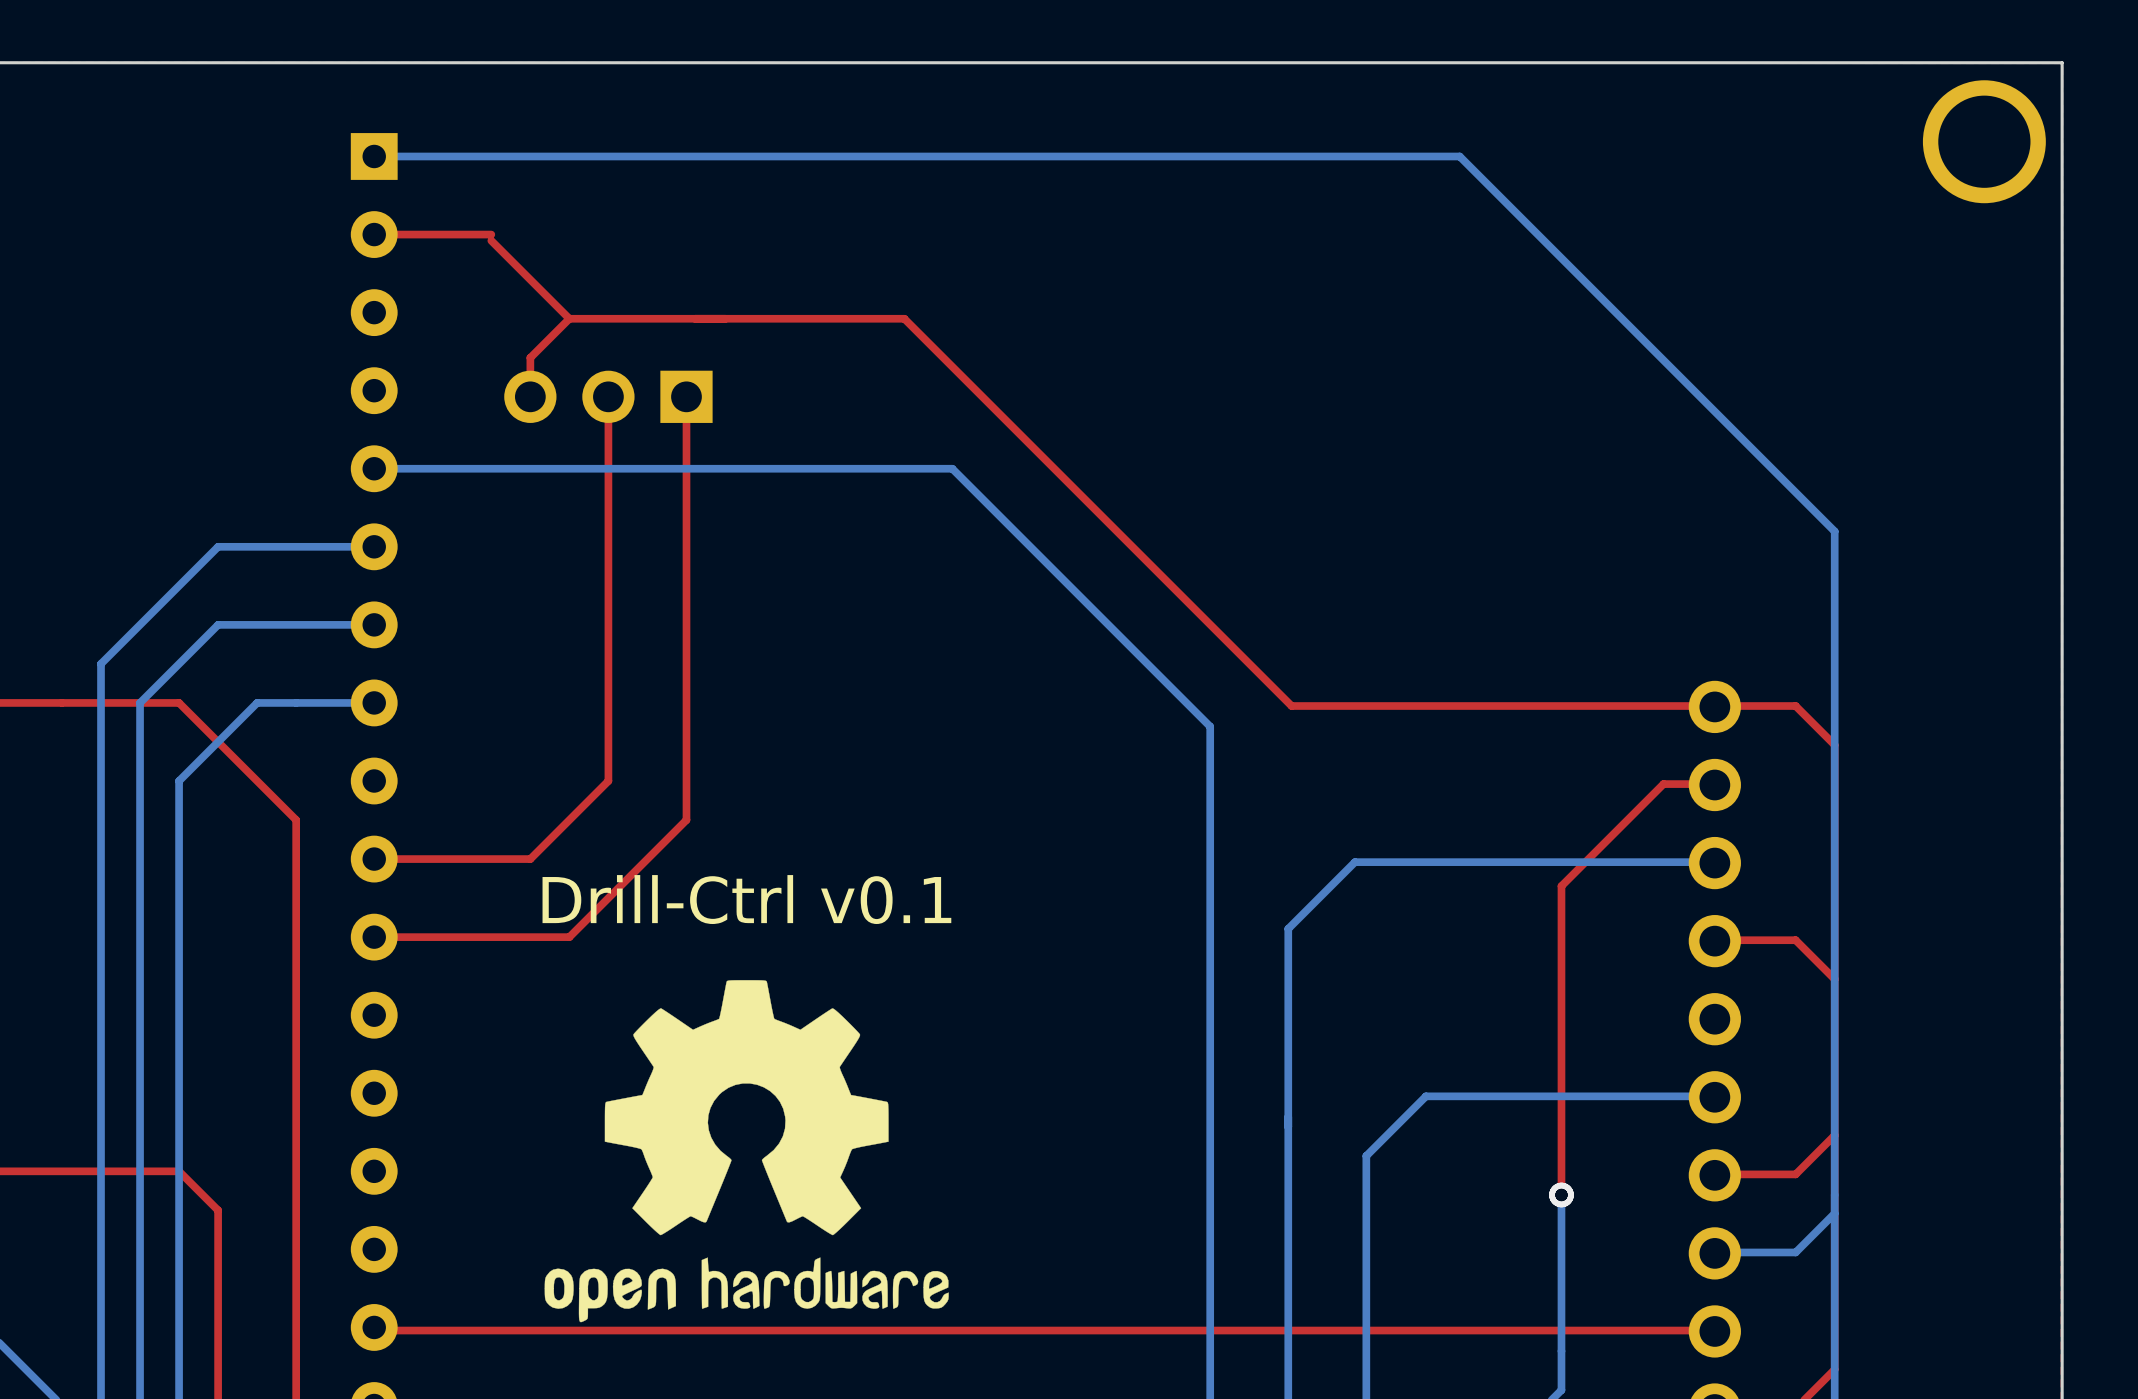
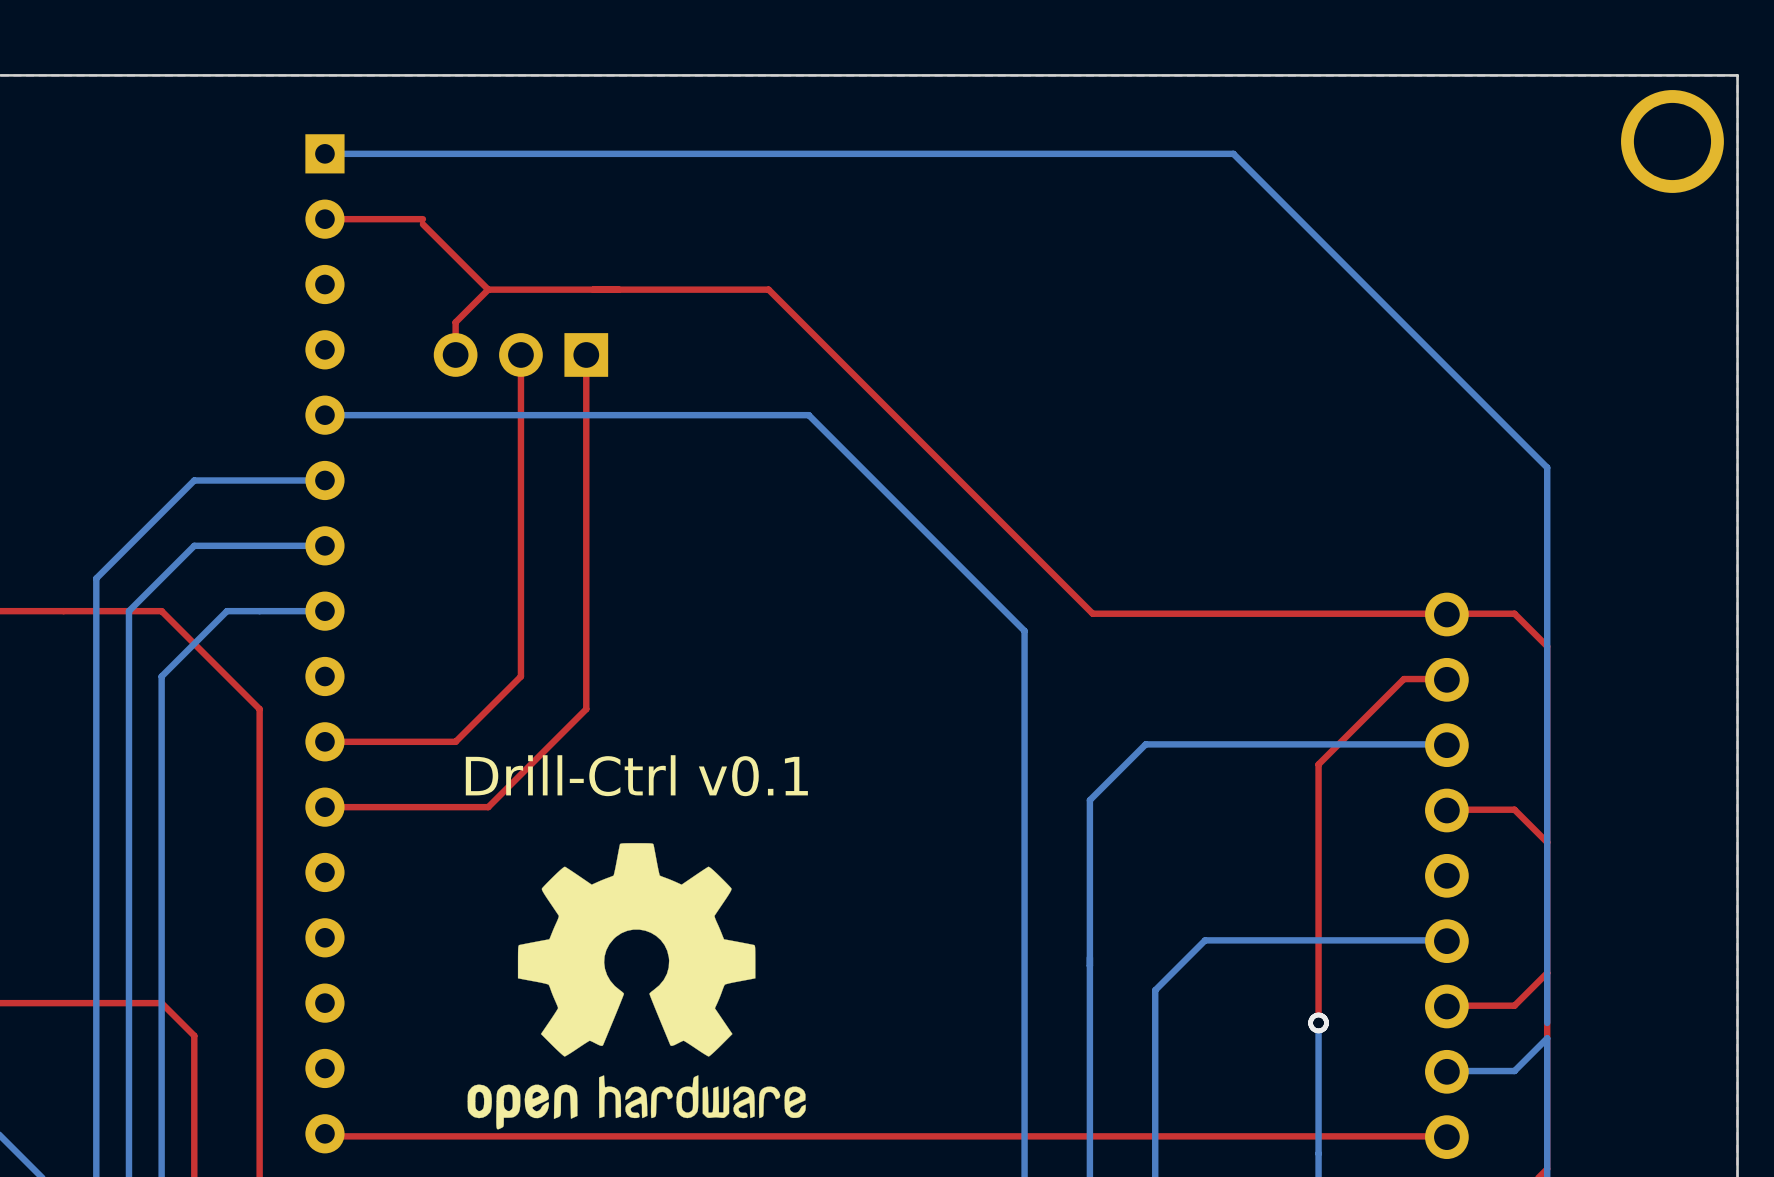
bottom track: (1834, 1194) (1834, 1213) -> none

